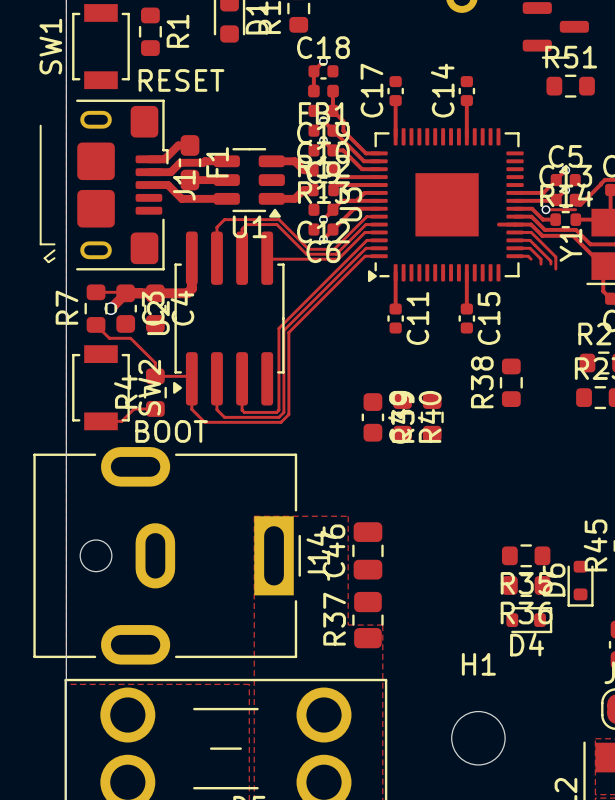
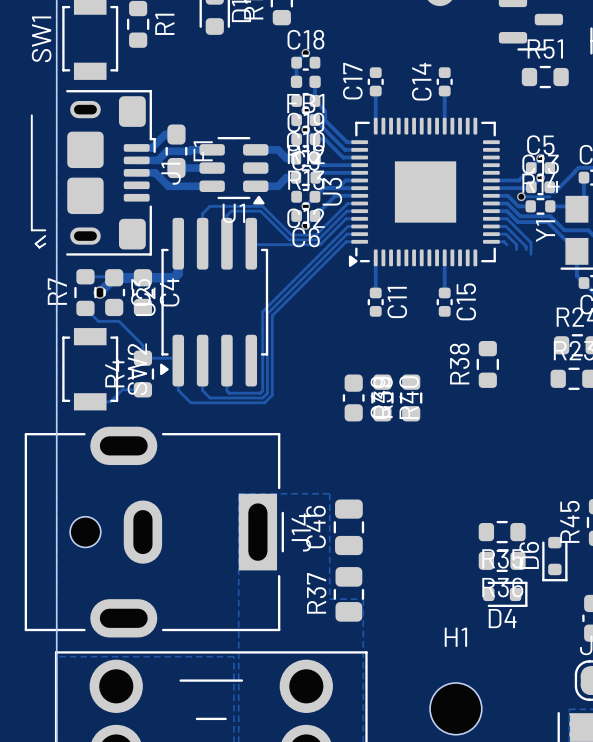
text: RESET (181, 80) -> none
track: (498, 224) (515, 224) -> none
text: BOOT (171, 431) -> none

